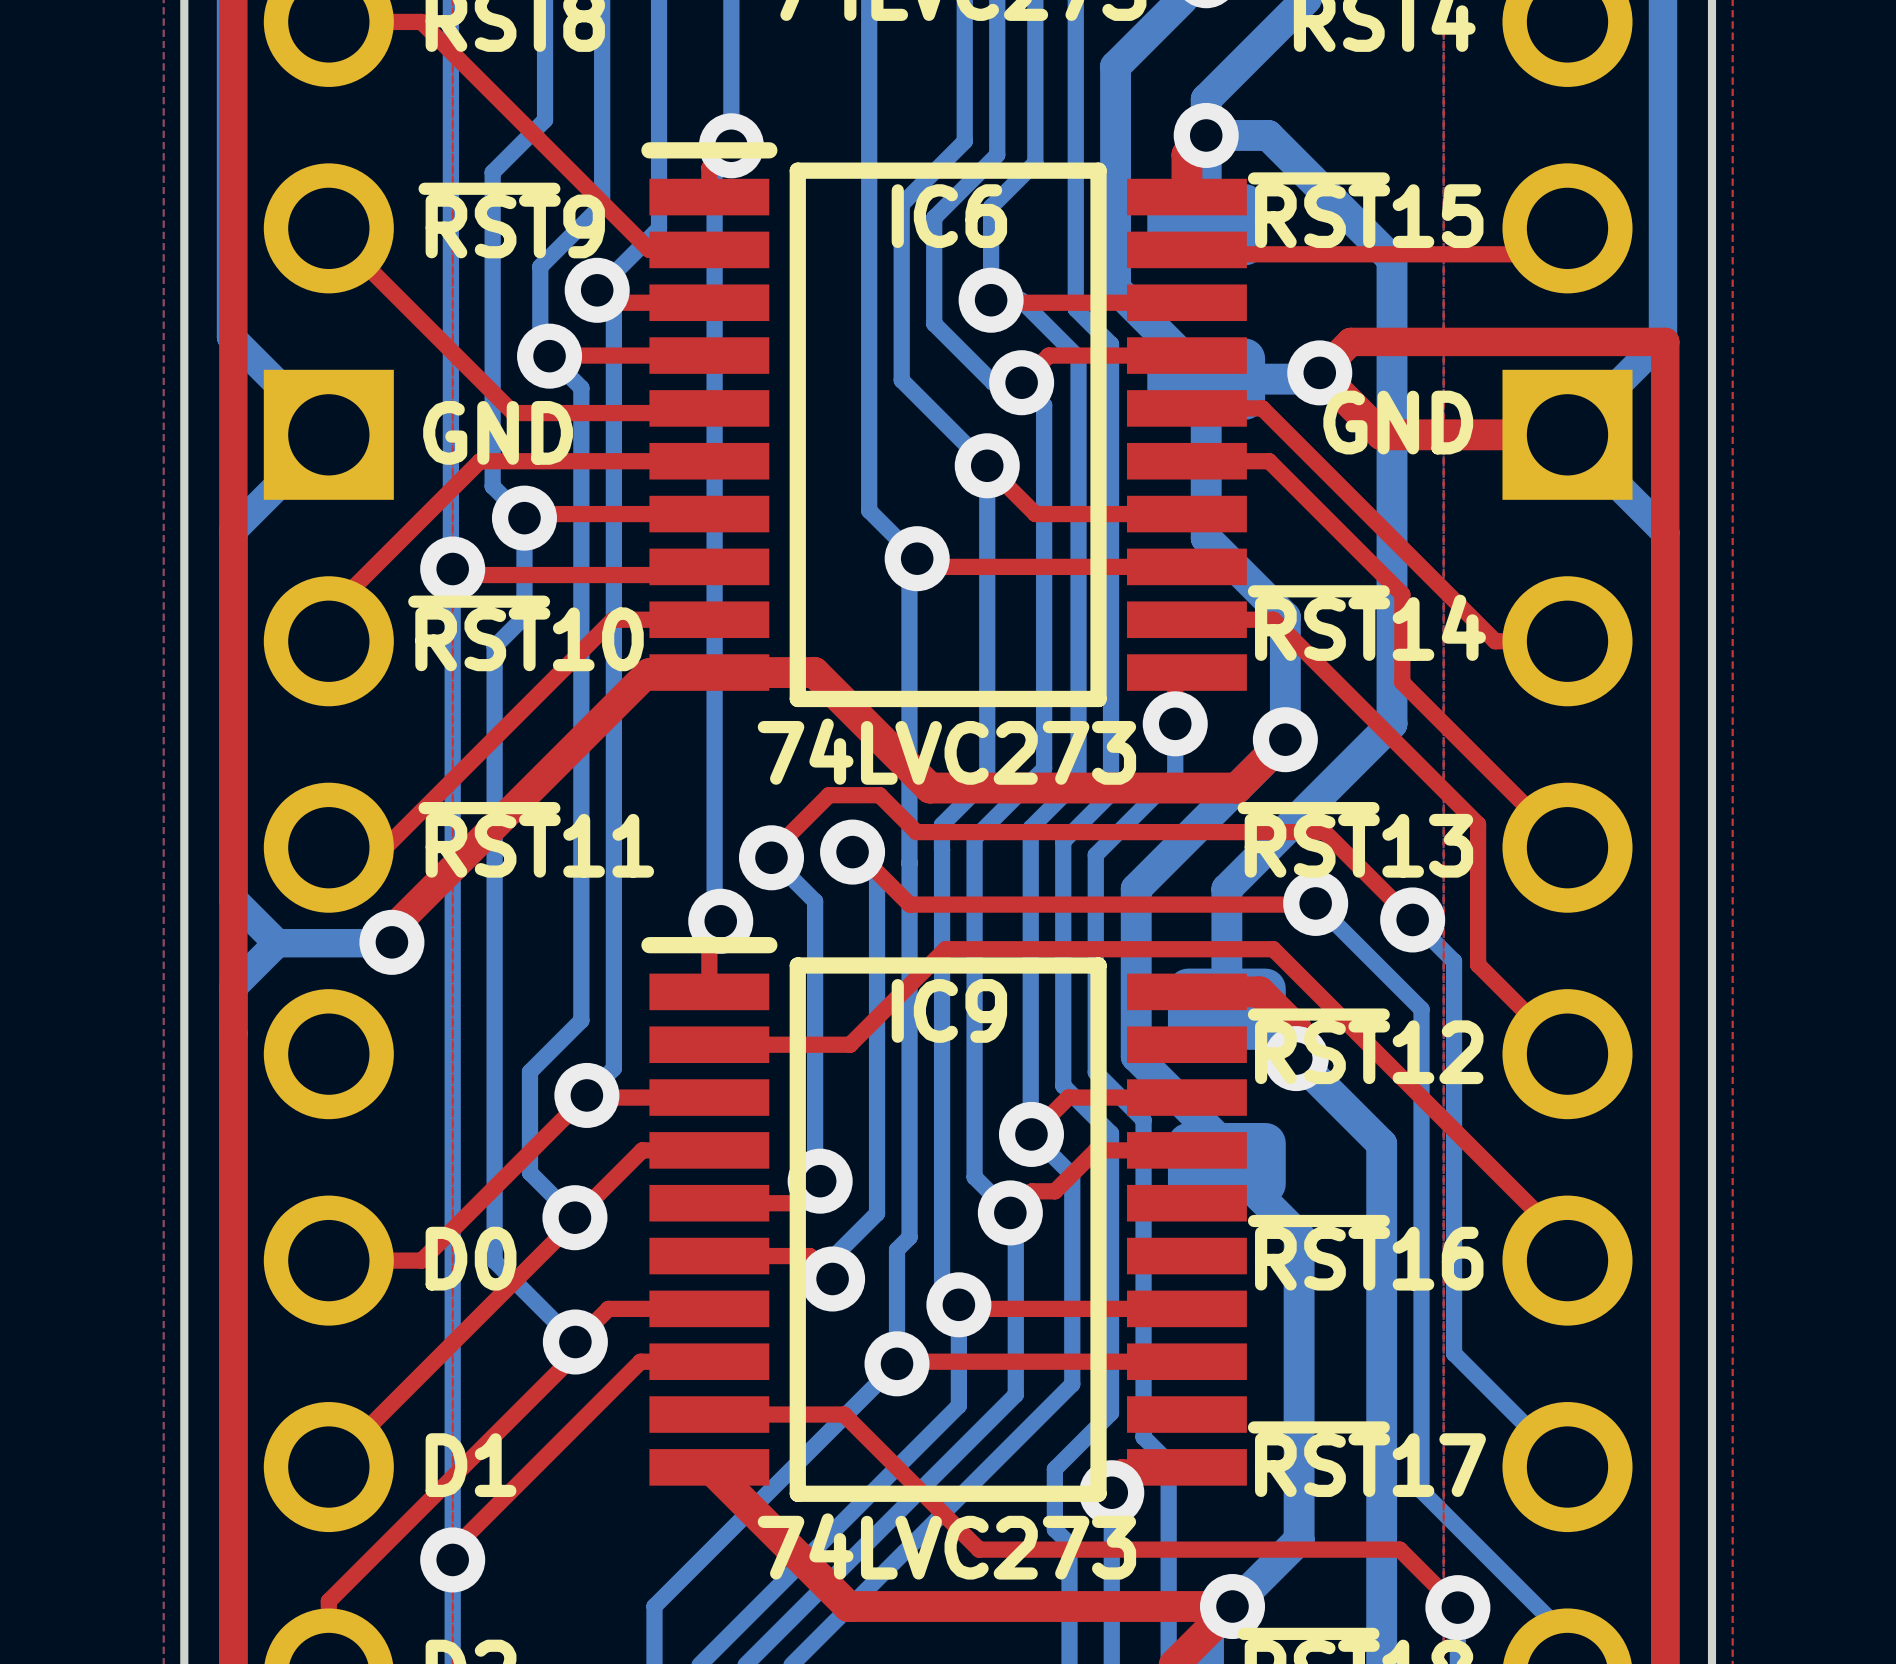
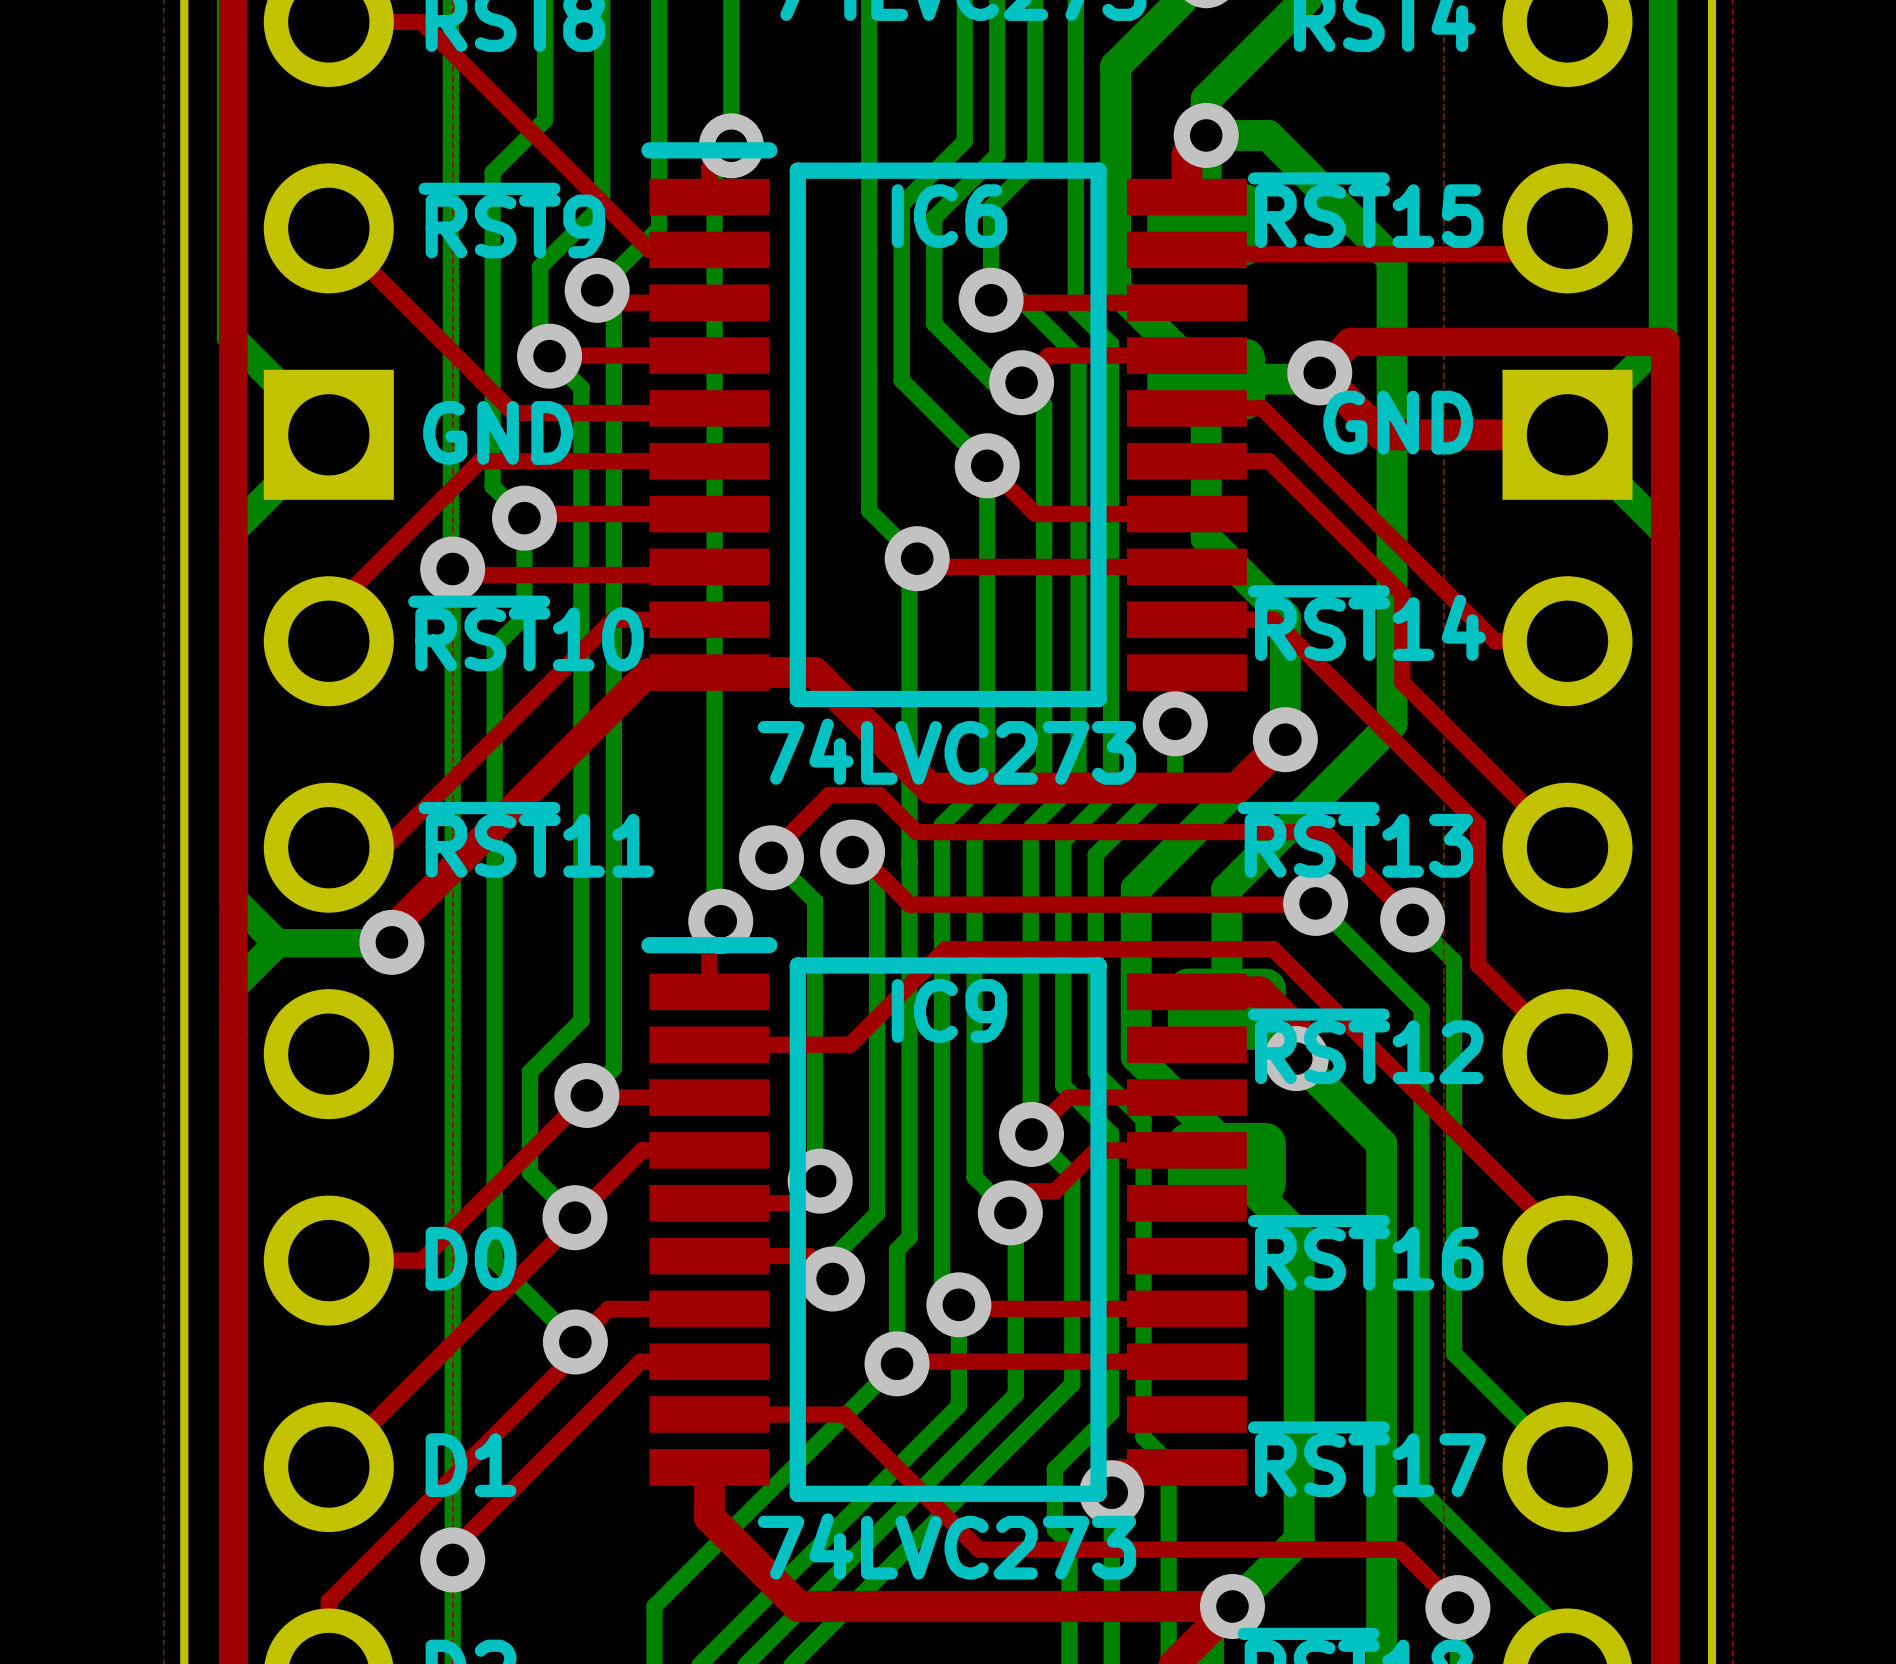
top track: (709, 1467) (848, 1606) -> (709, 1467) (709, 1517) (798, 1606) (848, 1606)

